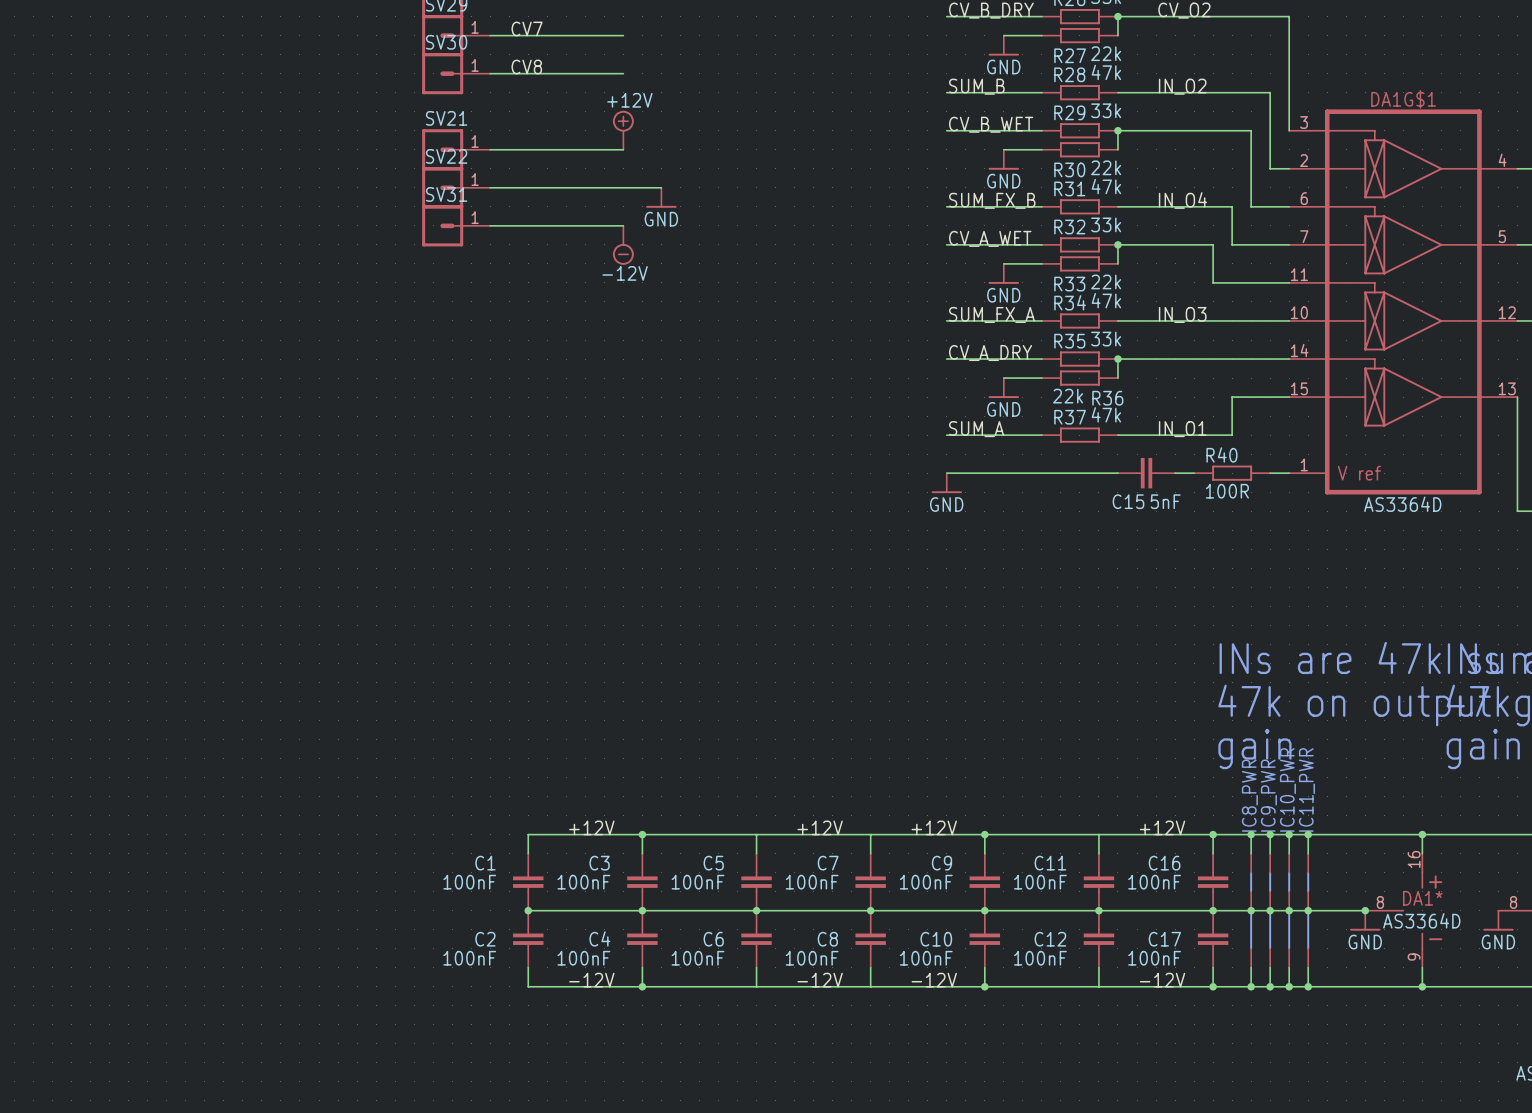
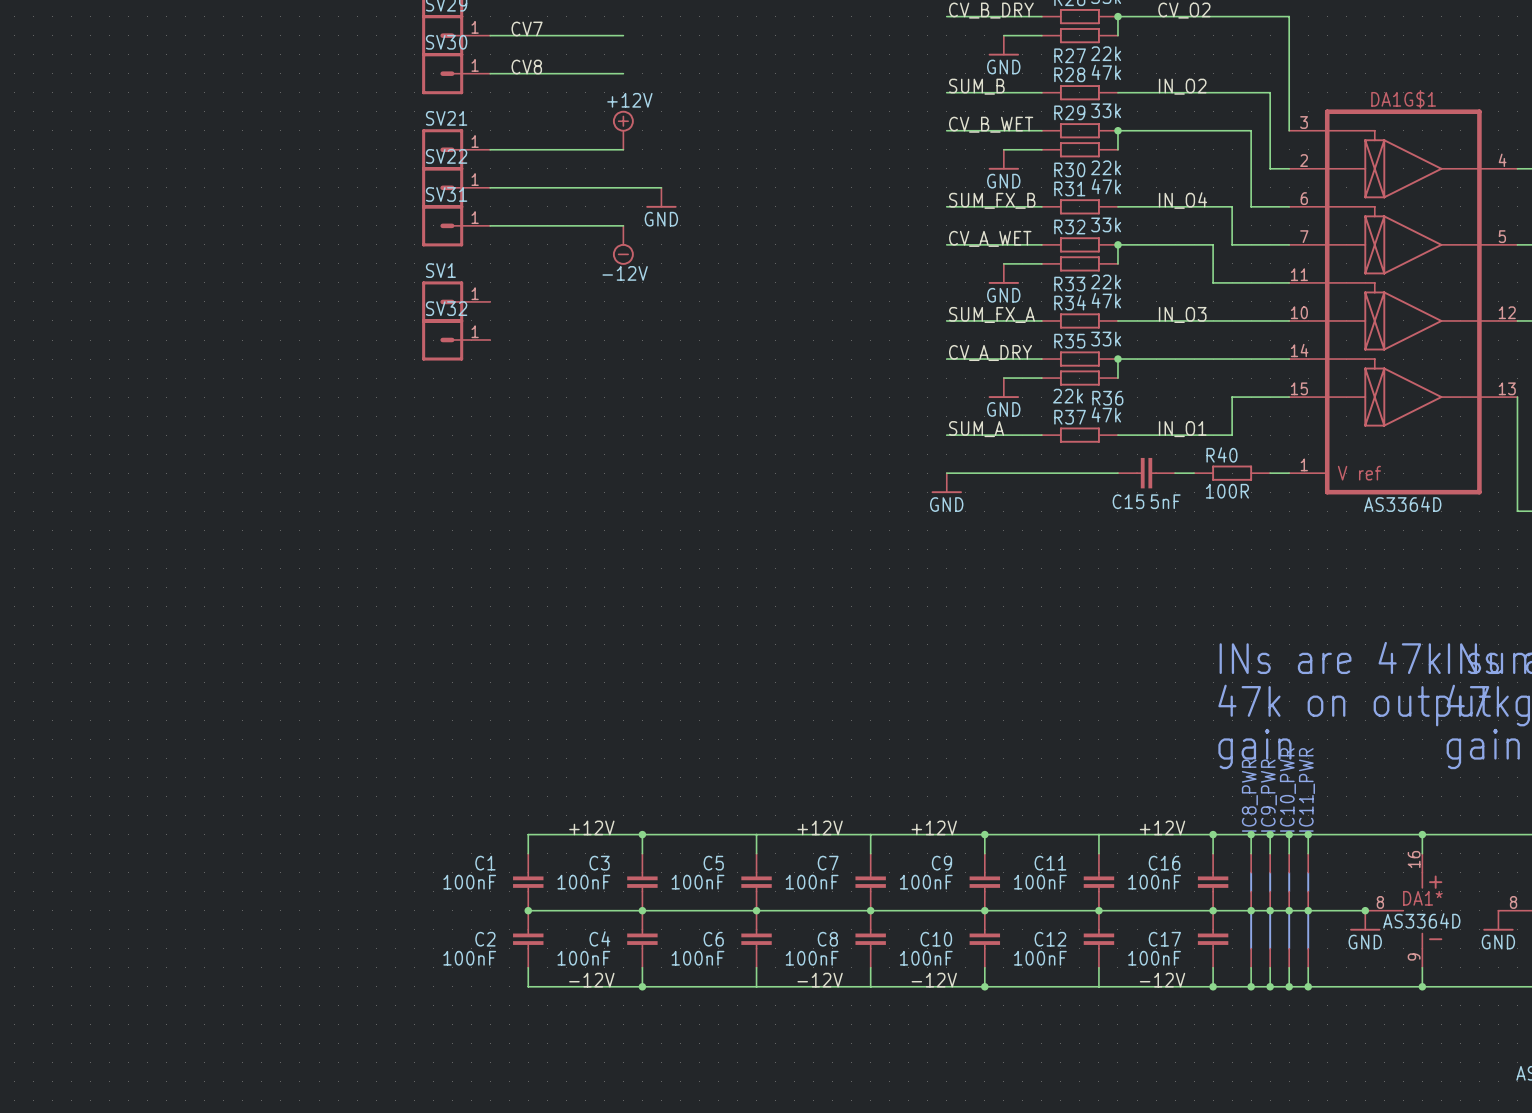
SV1: none -> (456, 301)
SV32: none -> (456, 340)

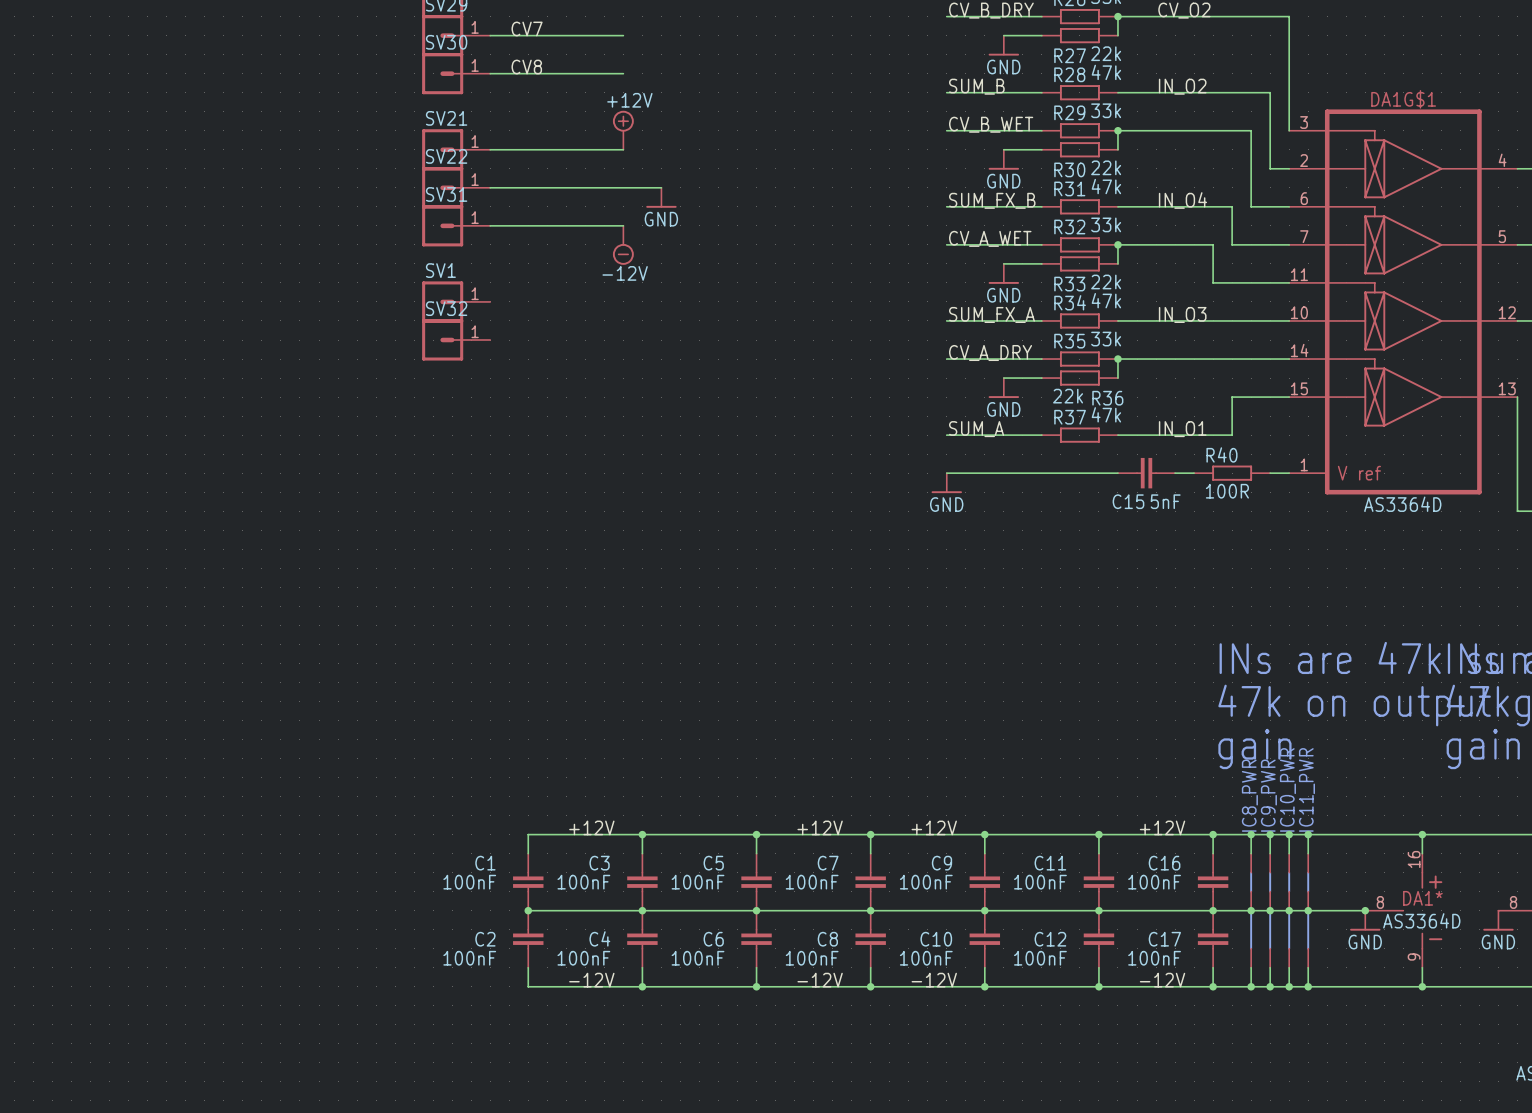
junction: none -> (756, 834)
junction: none -> (870, 834)
junction: none -> (1098, 834)
junction: none -> (756, 986)
junction: none -> (870, 986)
junction: none -> (1098, 986)

